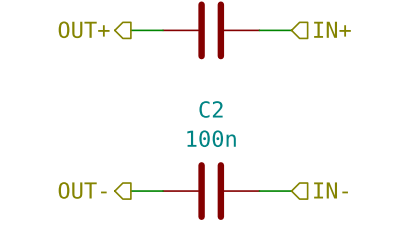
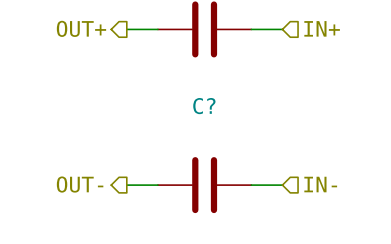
C2 name: C2 (211, 109) -> C? (204, 106)
C2 value: 100n (211, 138) -> none

